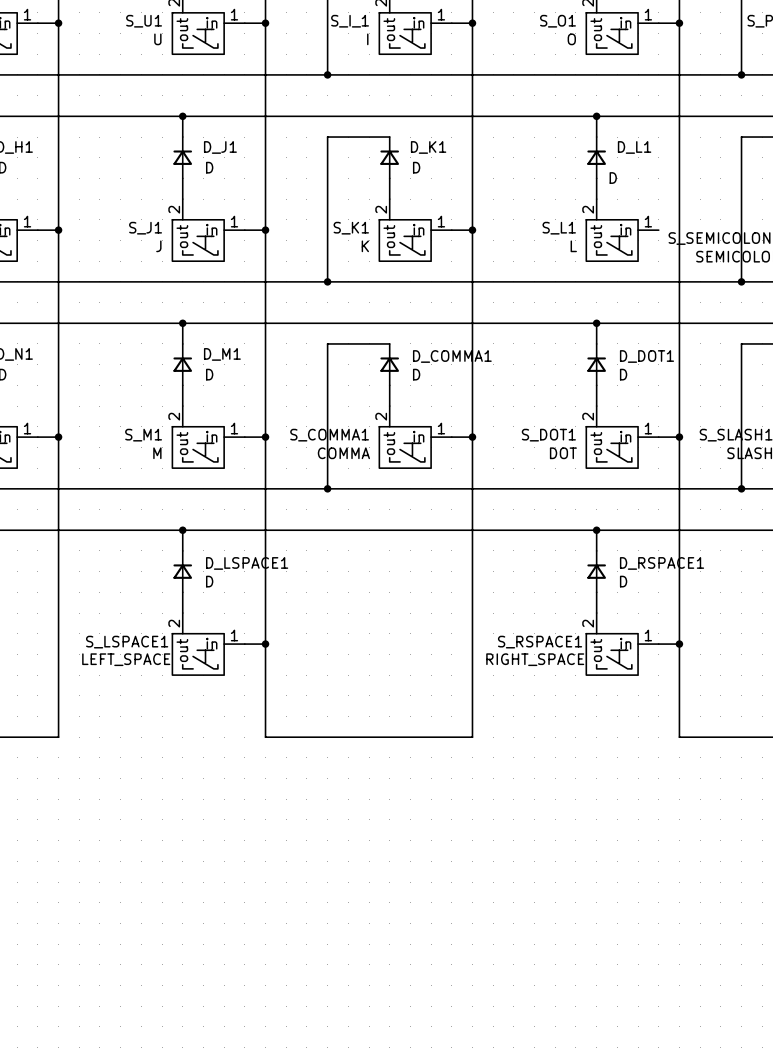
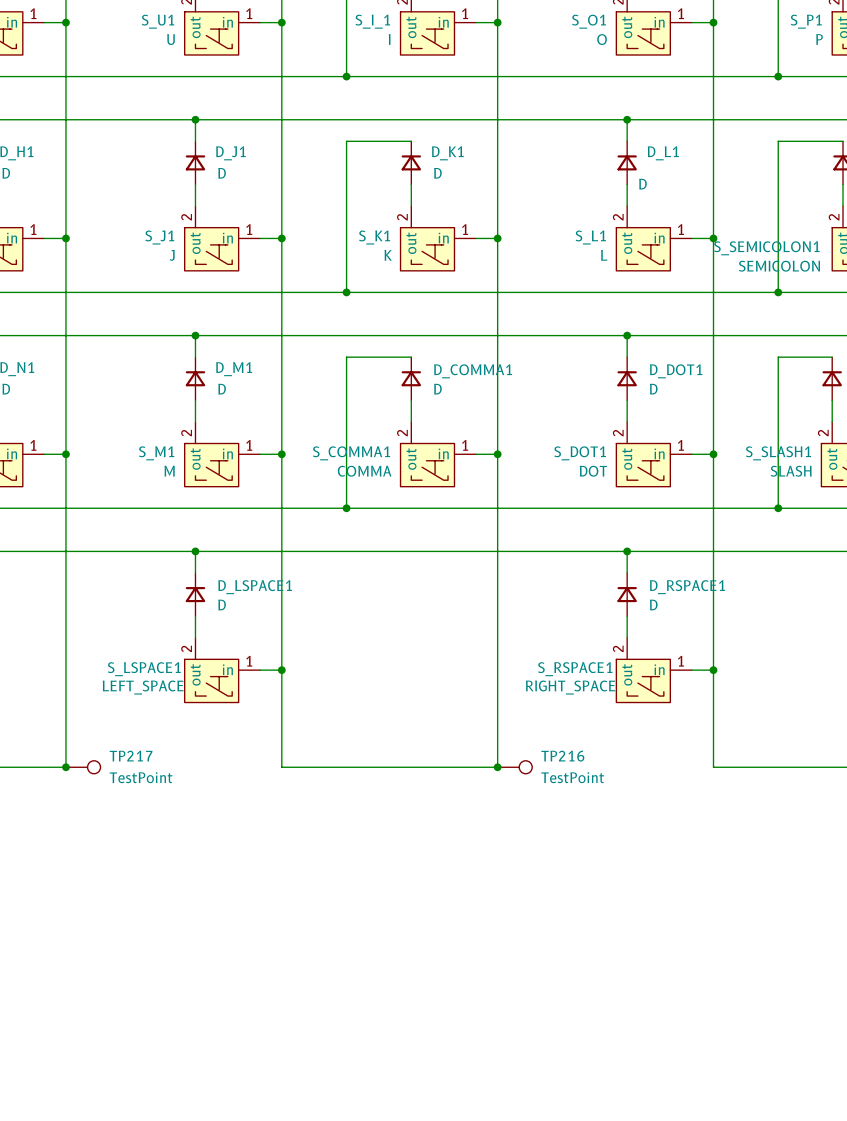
wire: none -> (691, 238) (713, 238)
junction: none -> (713, 238)
junction: none -> (65, 767)
TP217: none -> TestPoint (83, 767)
junction: none -> (497, 767)
TP216: none -> TestPoint (514, 767)

